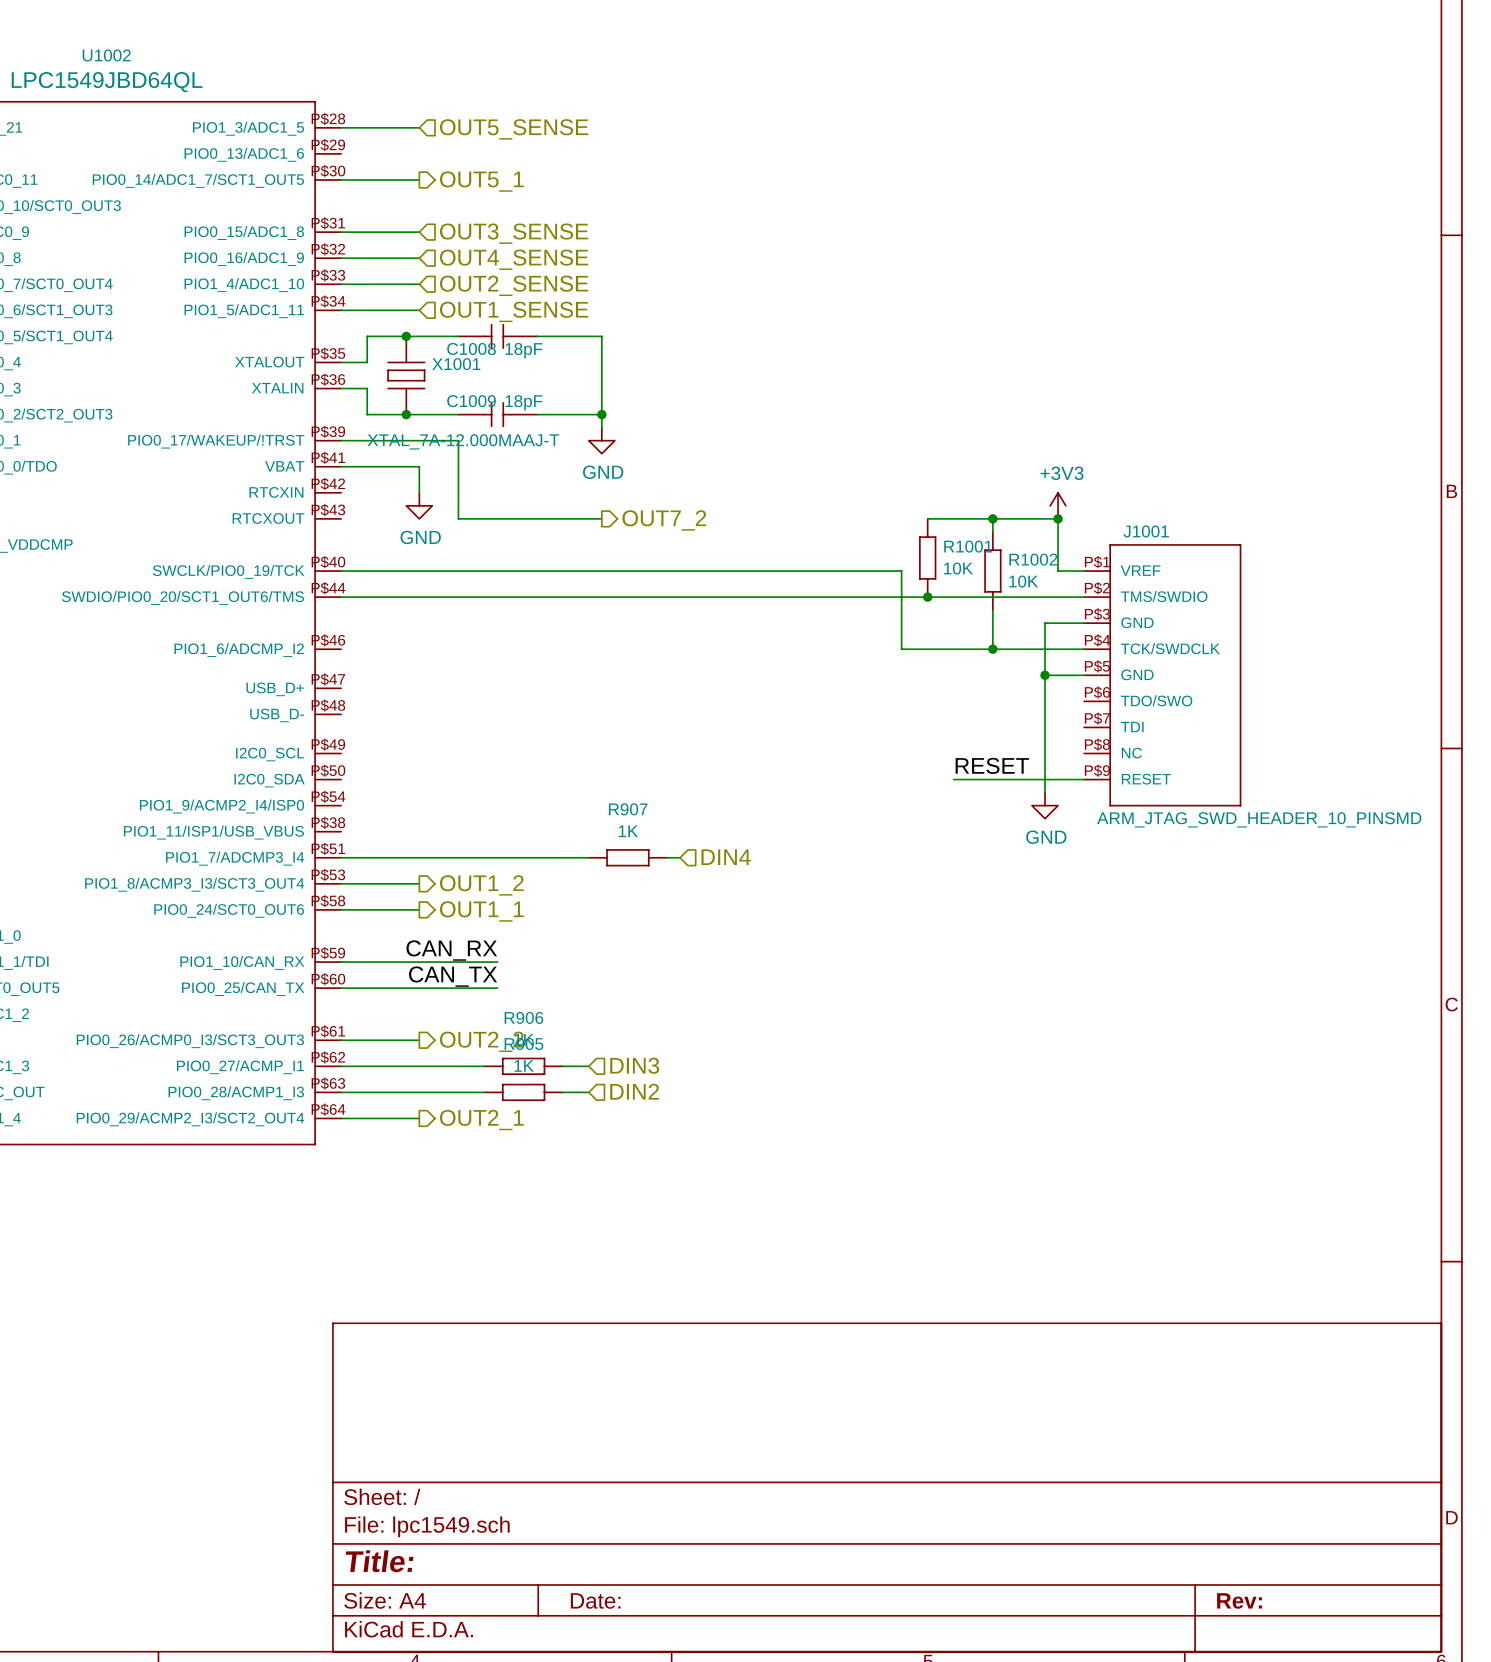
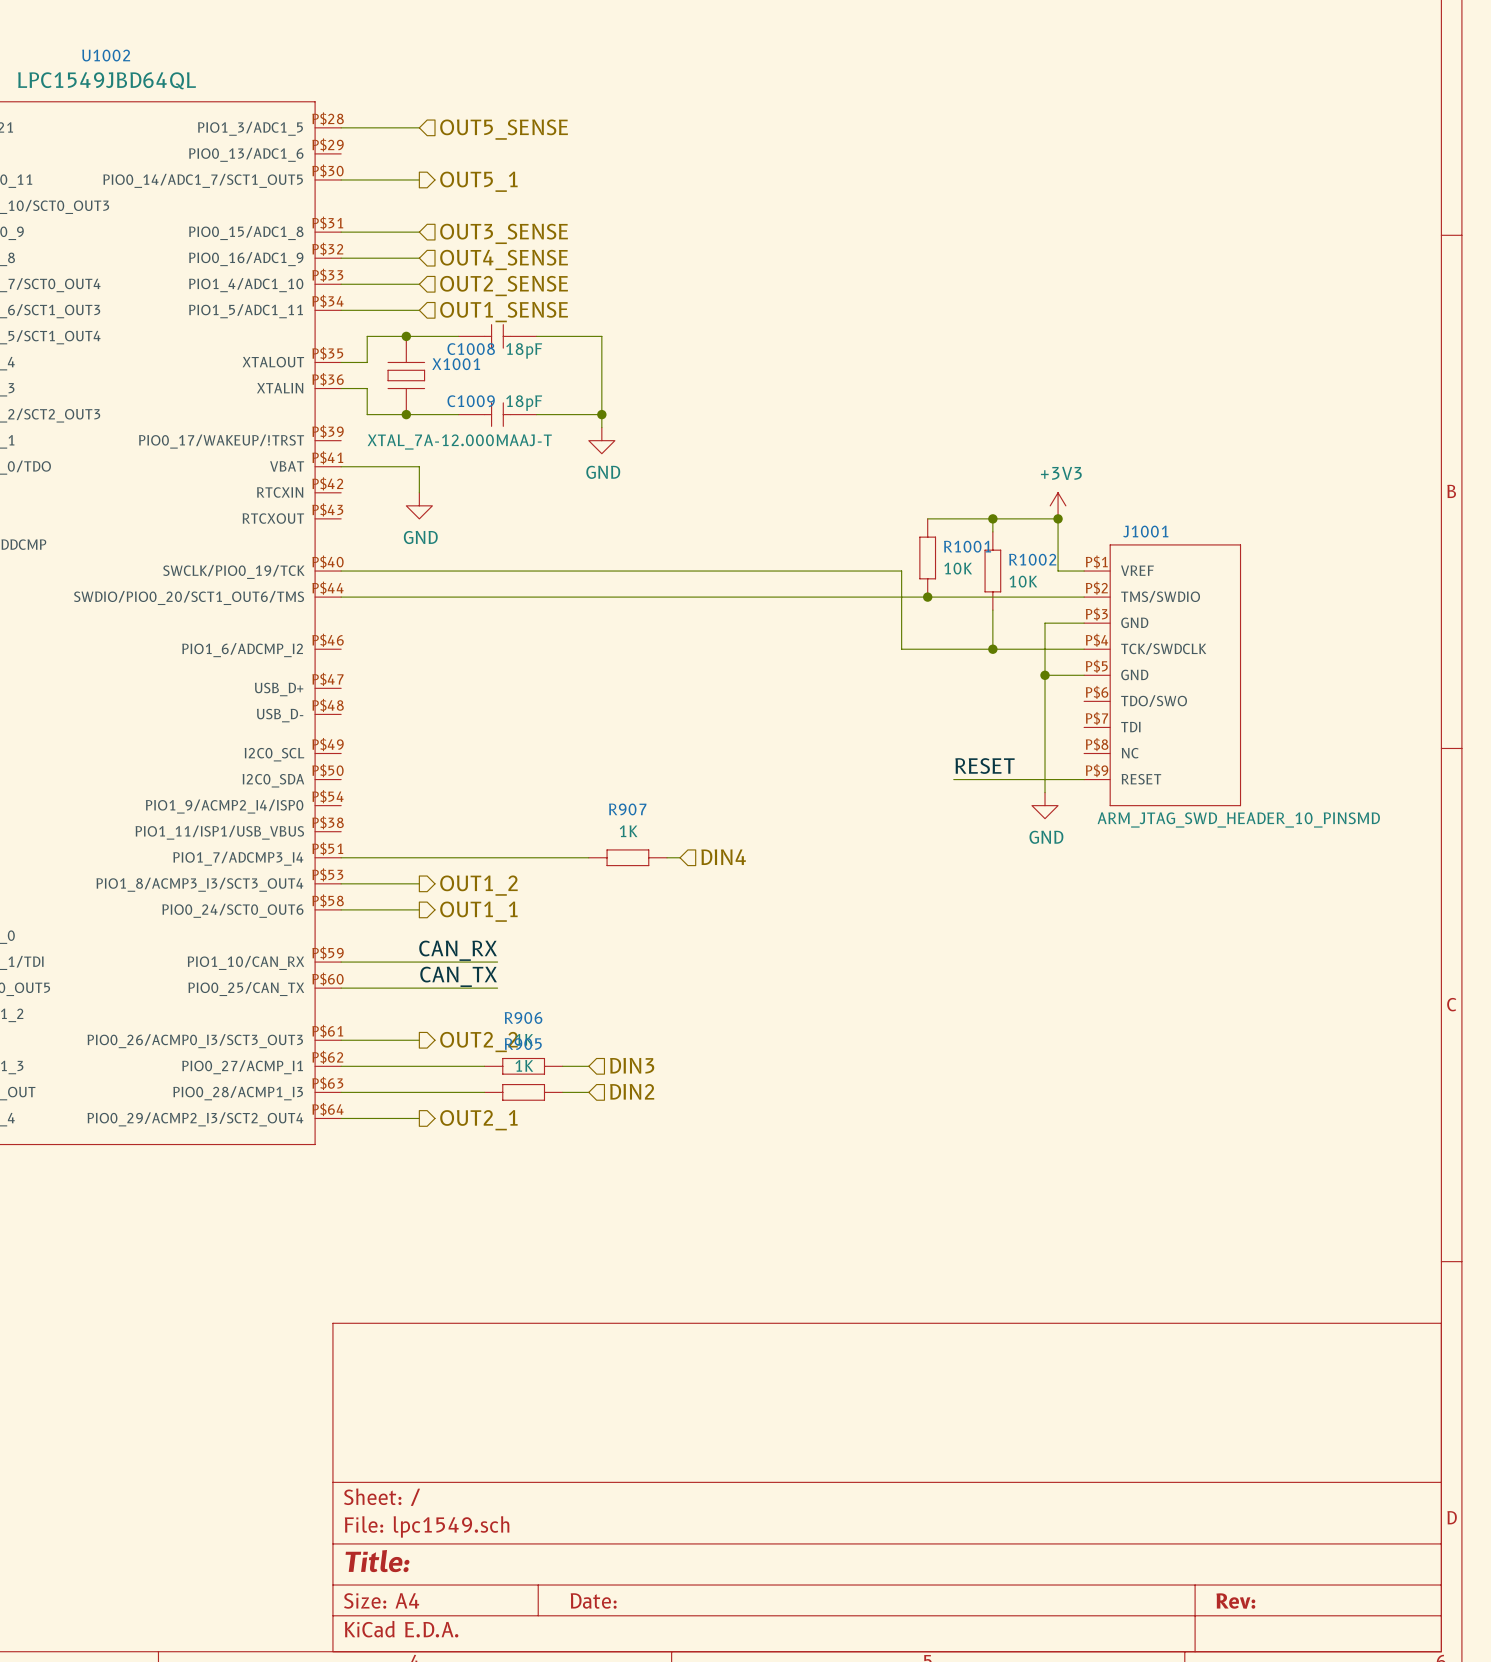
wire: (341, 440) (458, 440) (458, 518) (601, 518) -> none
hierarchical label: OUT7_2 (664, 520) -> none

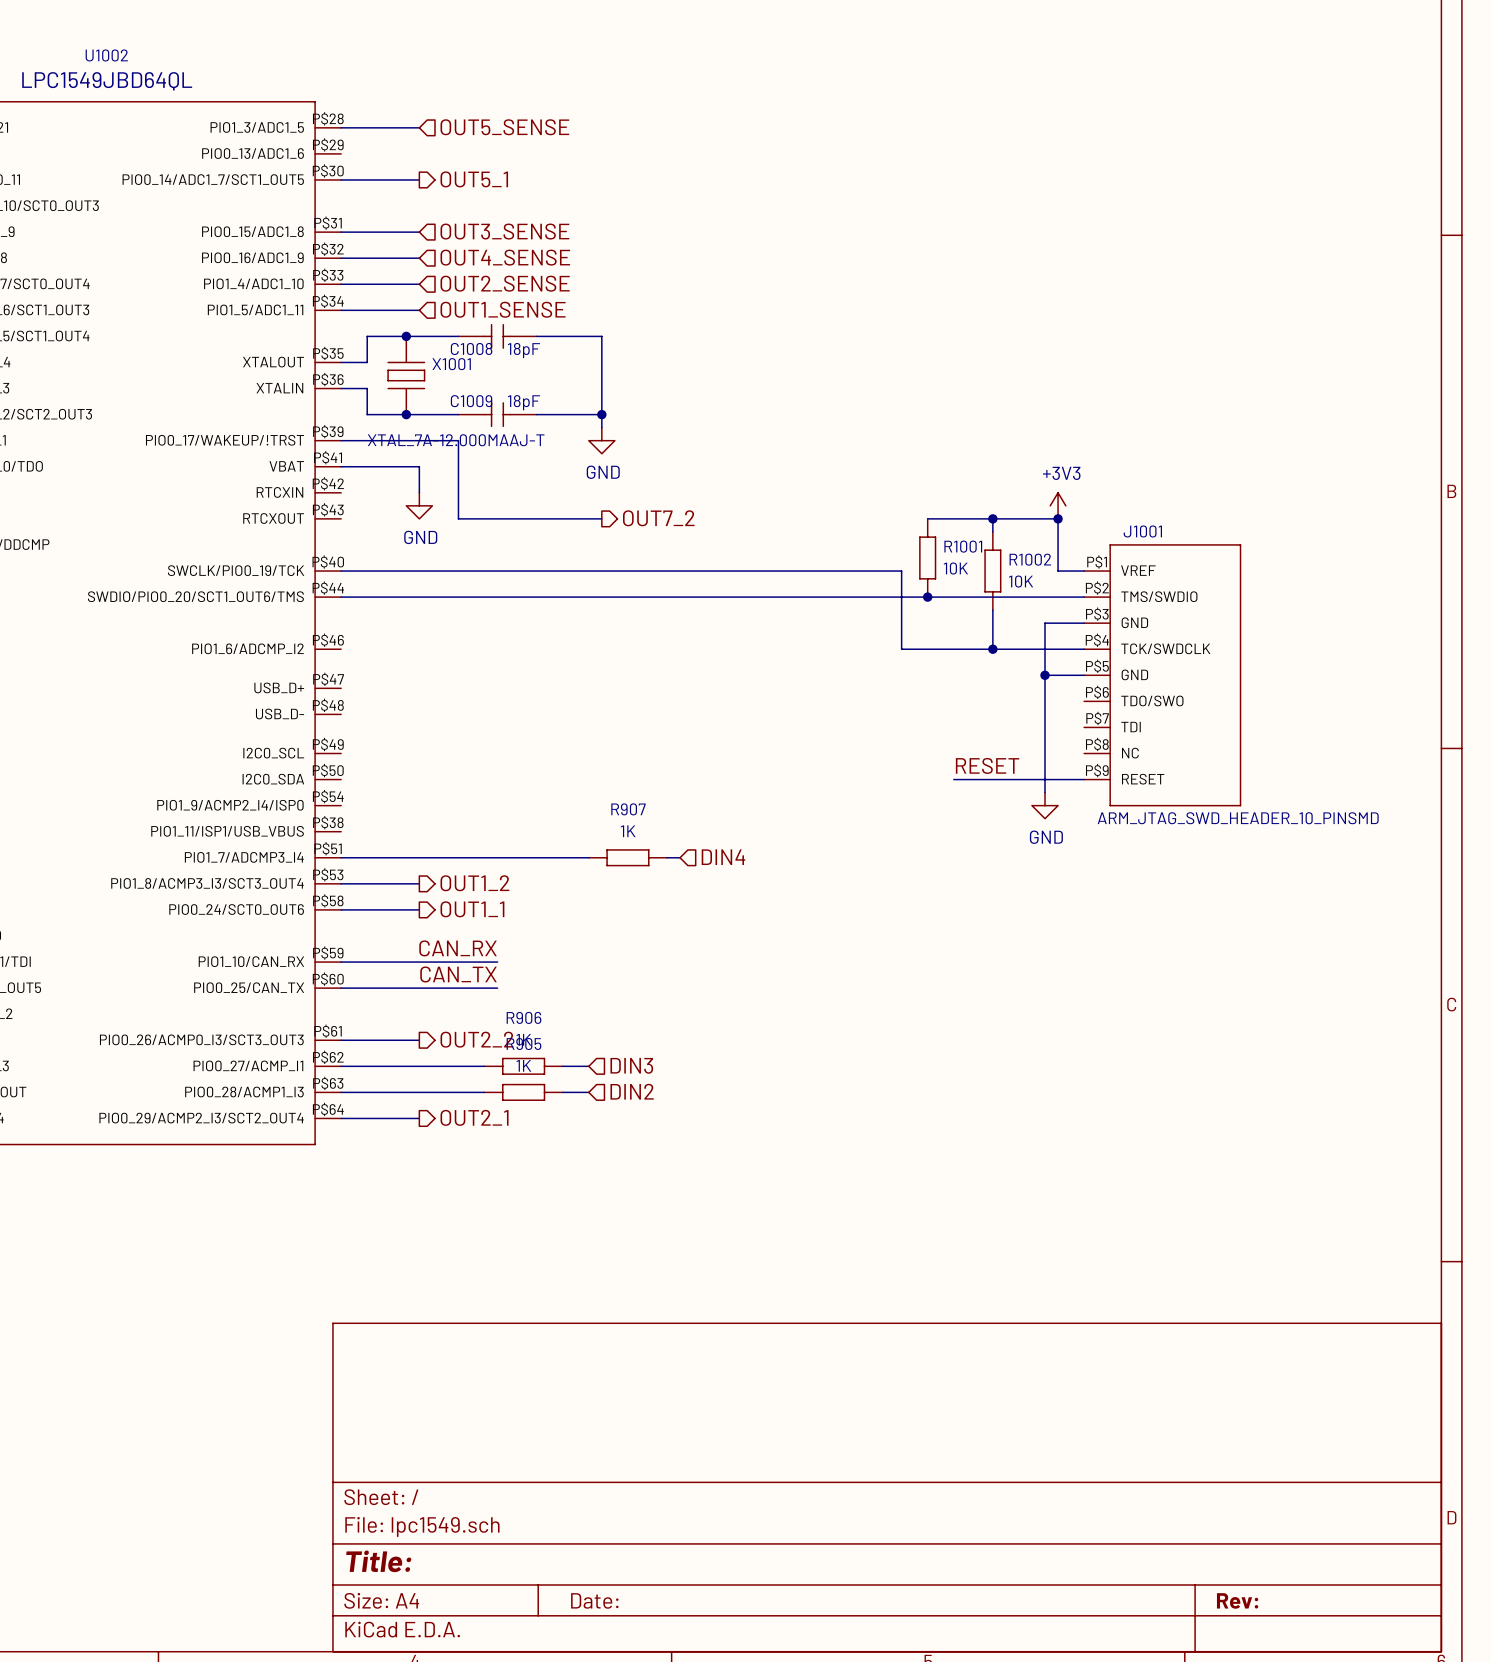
wire: none -> (341, 440) (458, 440) (458, 518) (601, 518)
hierarchical label: none -> OUT7_2 (658, 518)

